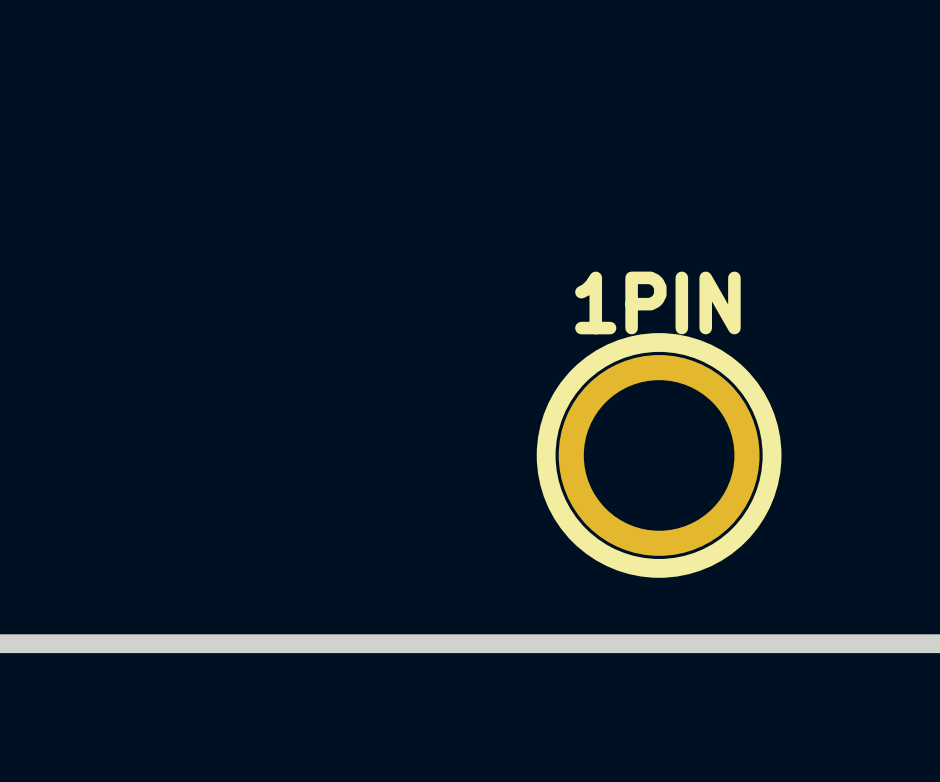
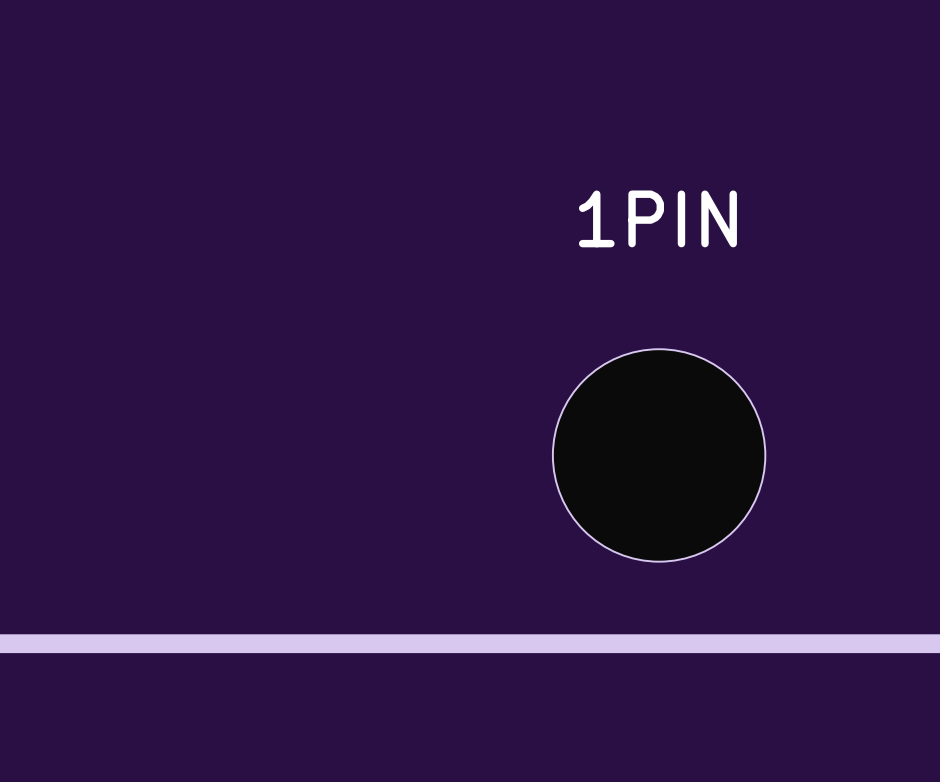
1PIN footprint: [536, 333, 782, 578] -> [552, 349, 766, 562]

